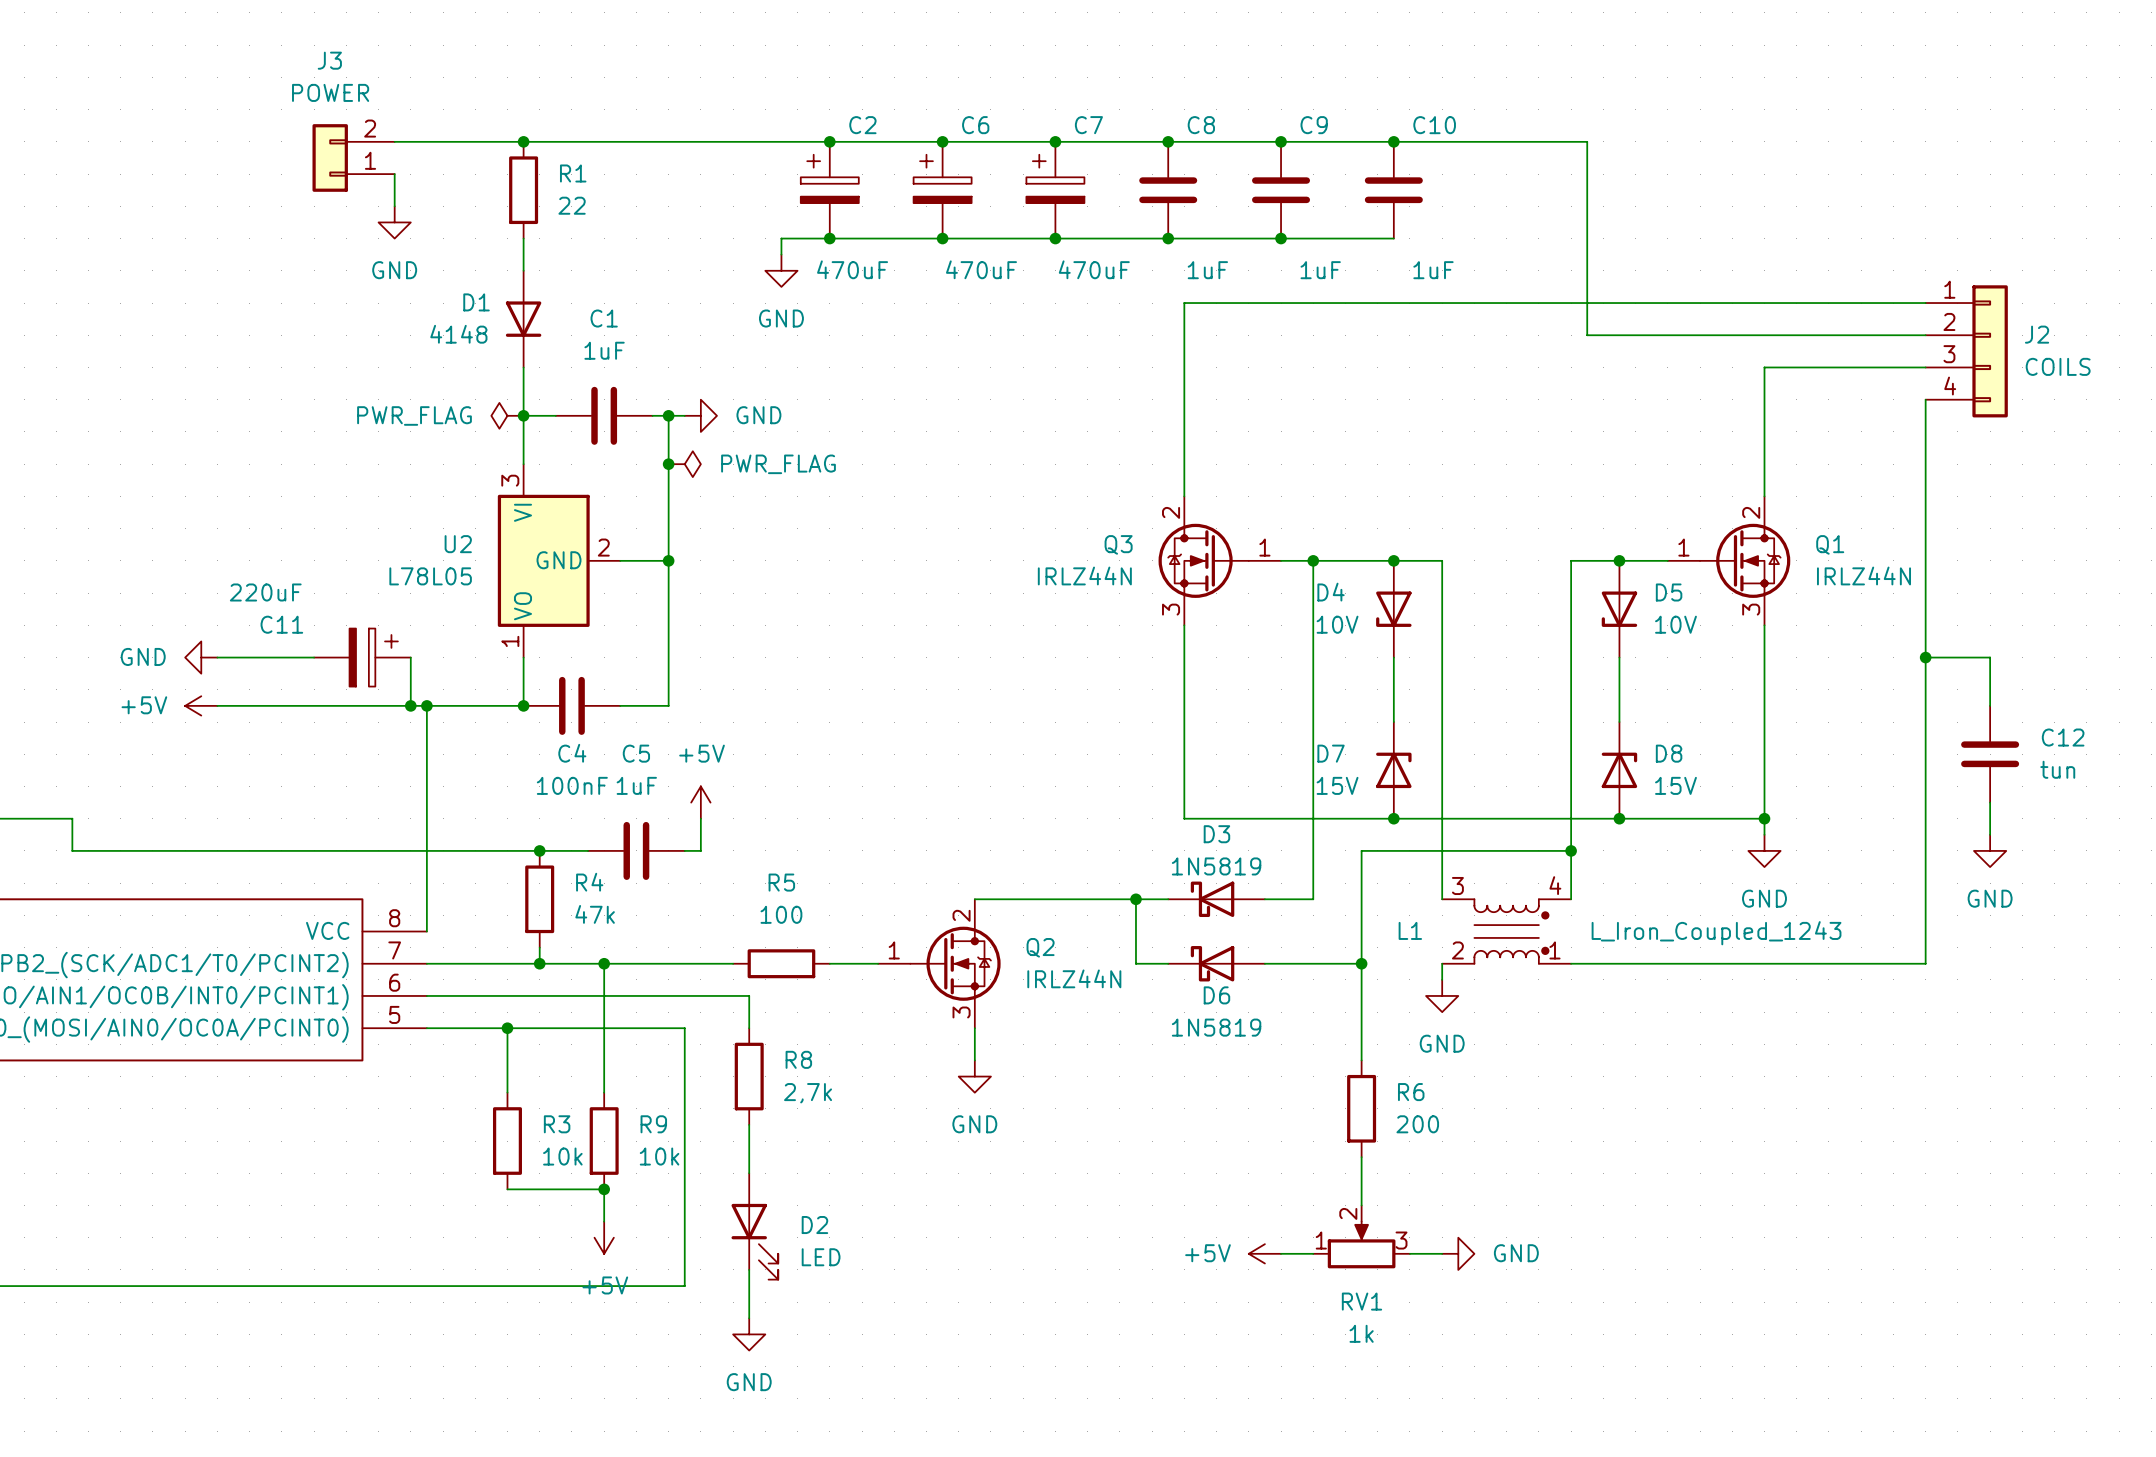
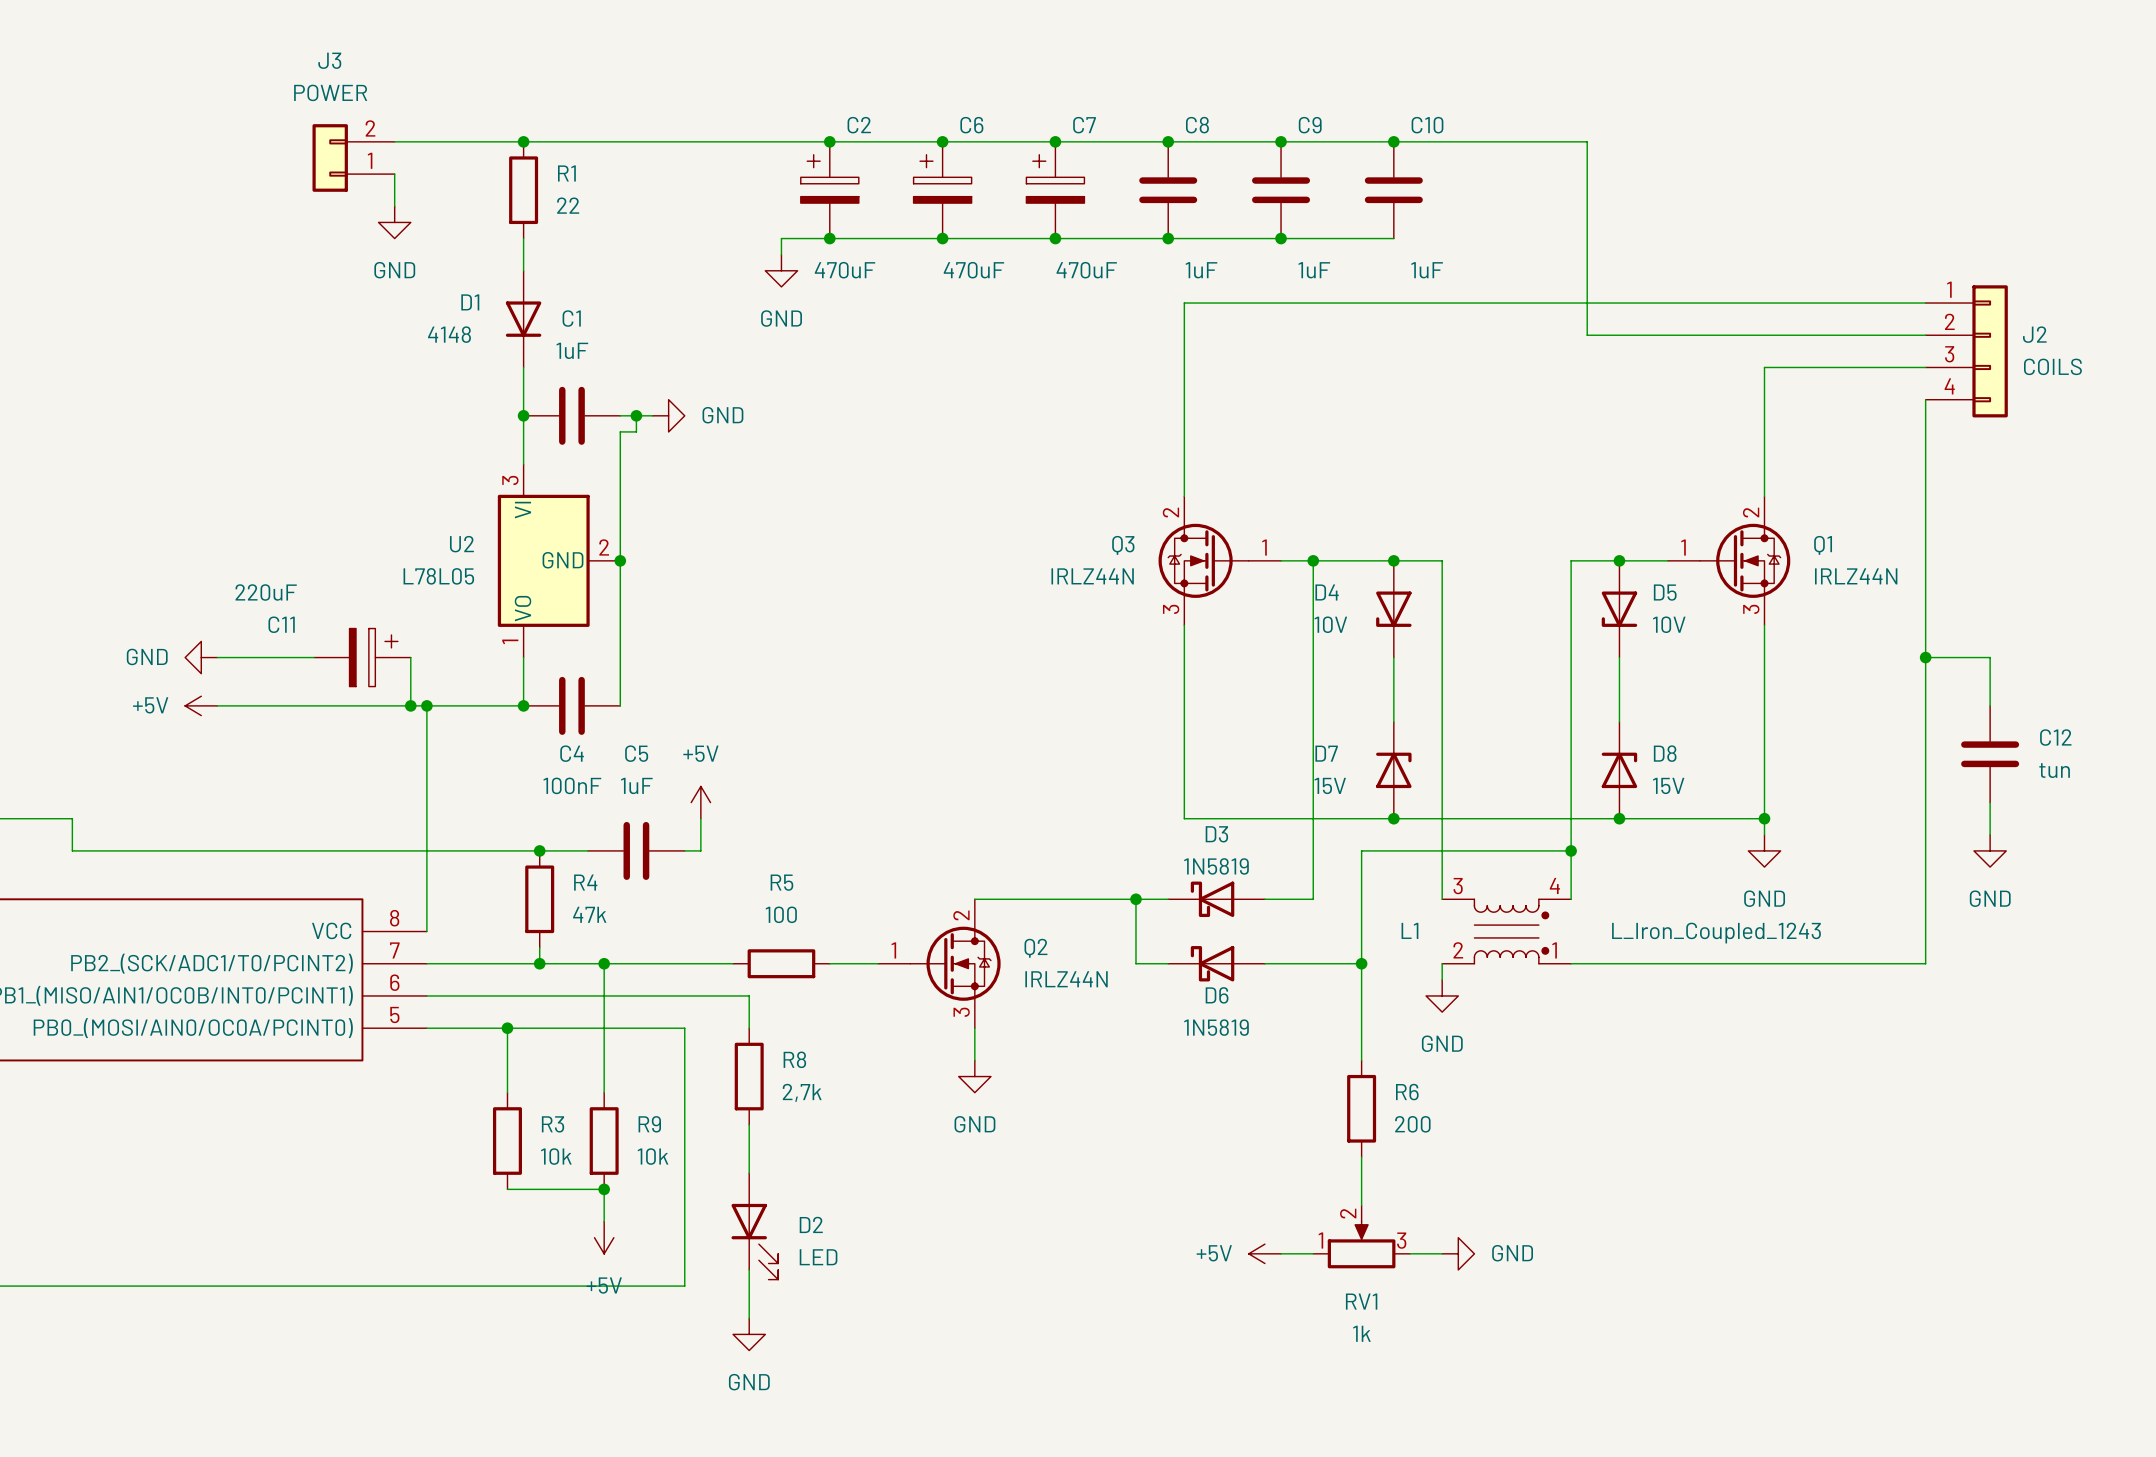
power symbol: PWR_FLAG (507, 415) -> none
C1 position: (604, 415) -> (571, 415)
junction: none -> (636, 415)
wire: (668, 415) (668, 705) (620, 705) -> (636, 415) (636, 431) (620, 431) (620, 705)
junction: (668, 415) -> none
power symbol position: GND (700, 415) -> GND (668, 415)
junction: (668, 464) -> none
power symbol: PWR_FLAG (684, 464) -> none
wire: (620, 560) (668, 560) -> none
junction position: (668, 560) -> (620, 560)

